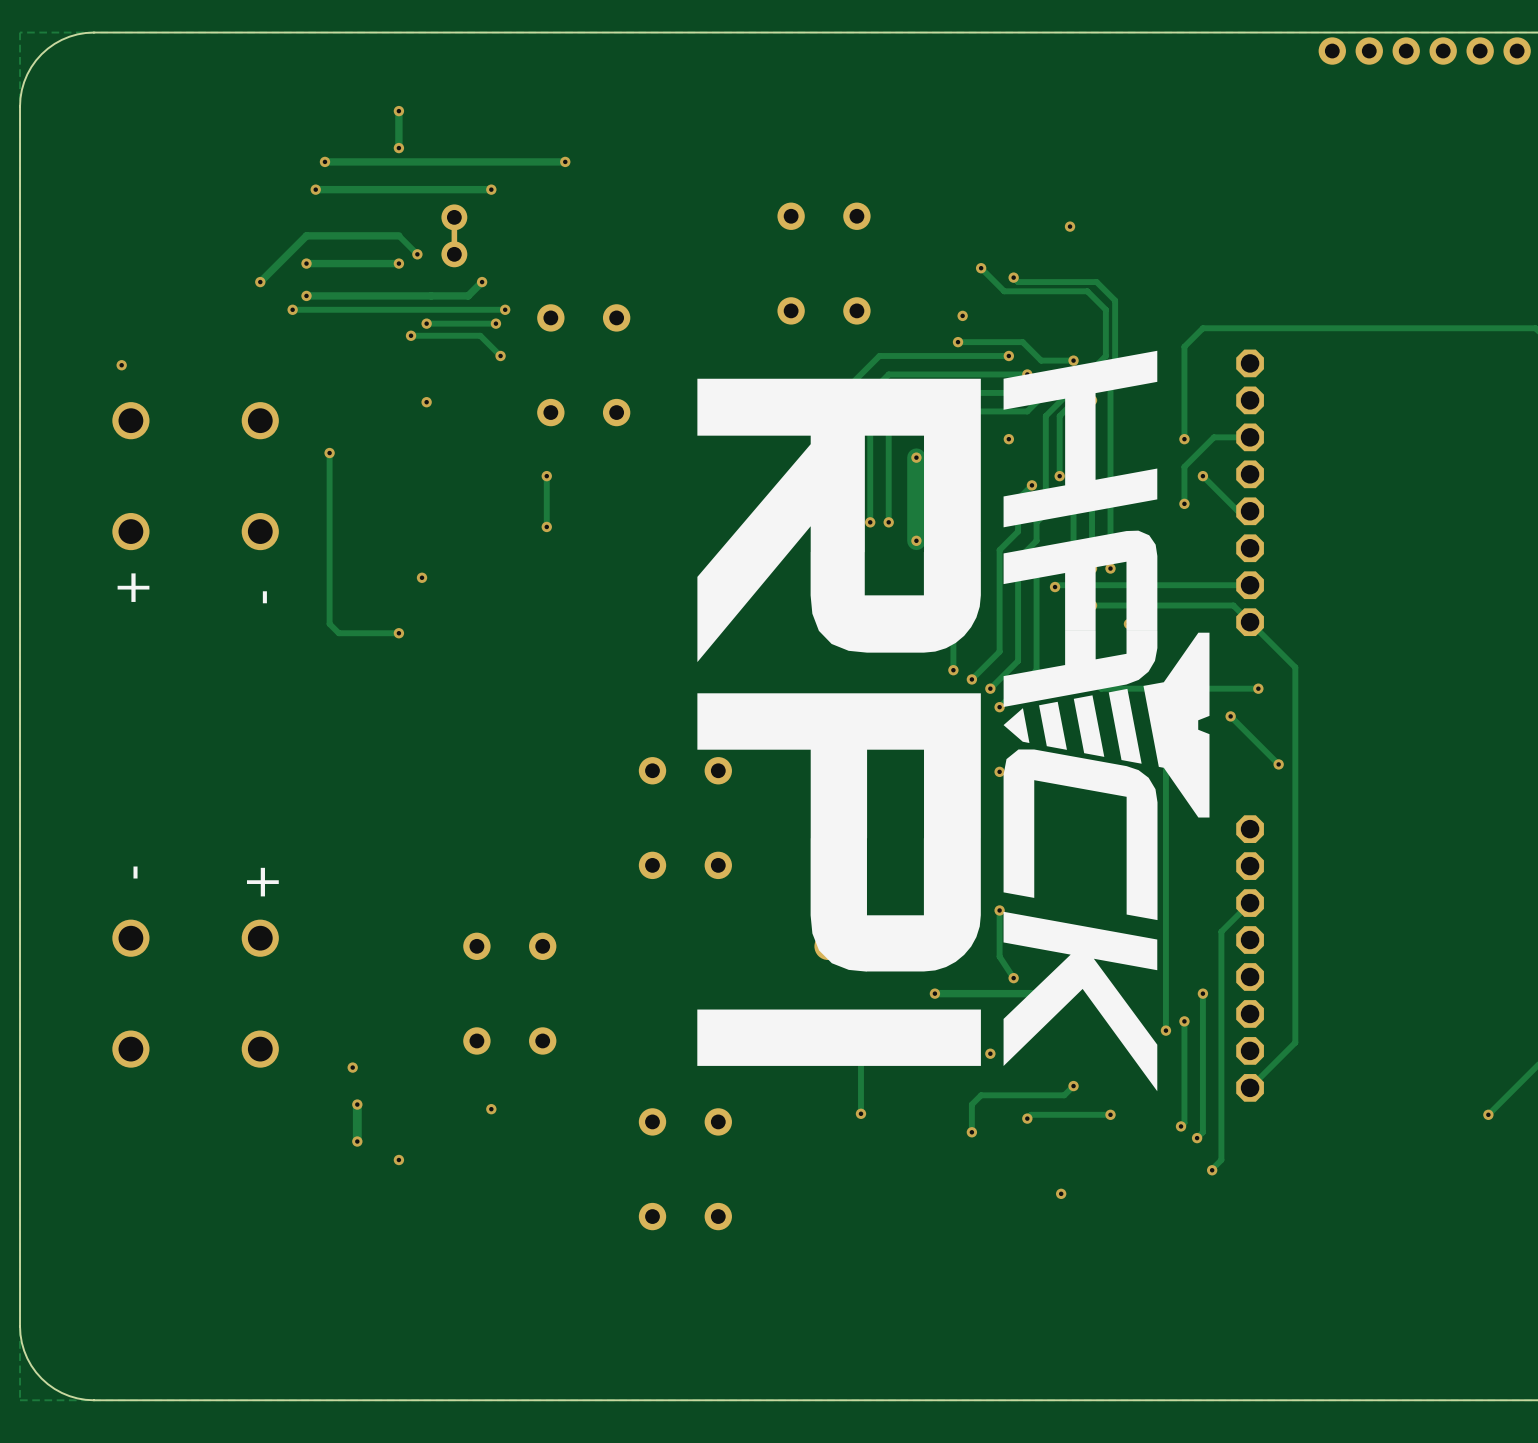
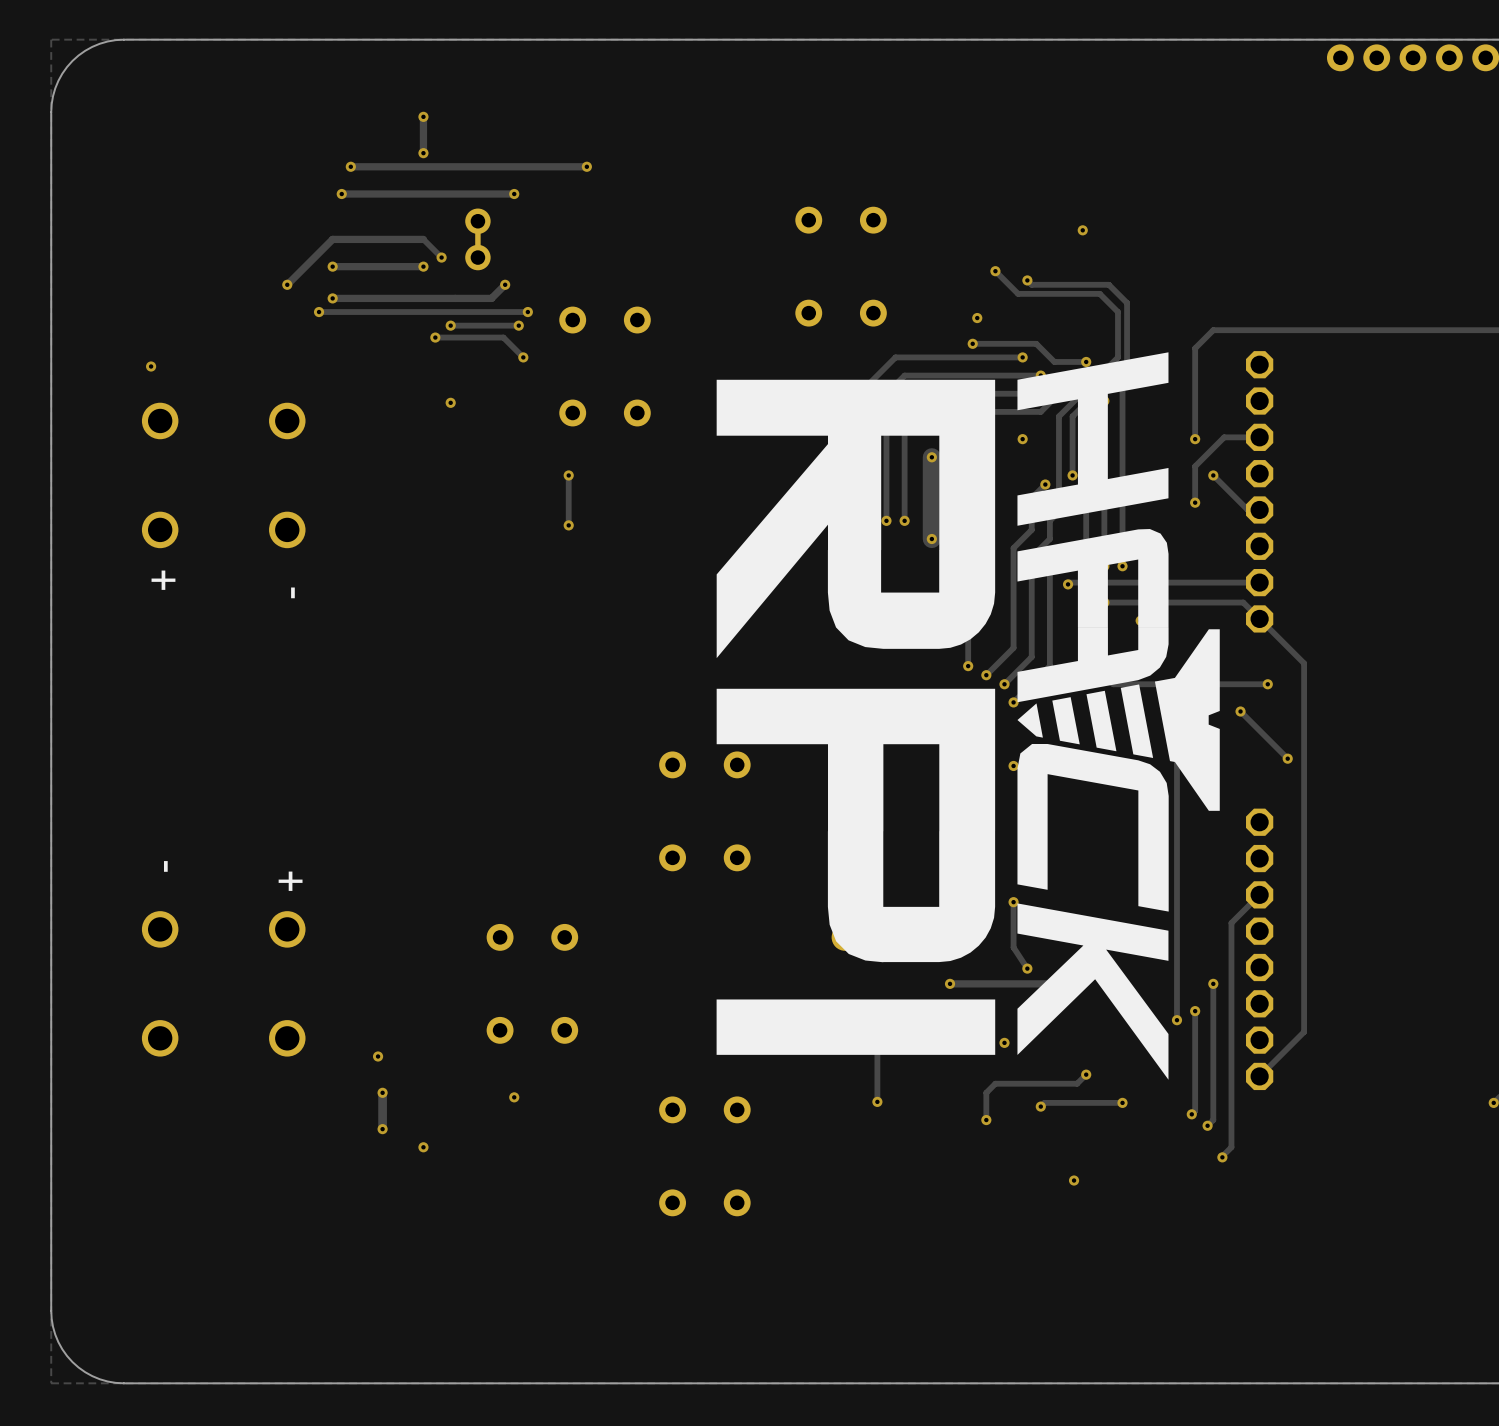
track: (329, 453) (329, 623) (338, 633) (398, 633) -> none
via: (329, 453) -> none
via: (422, 577) -> none
via: (398, 633) -> none

